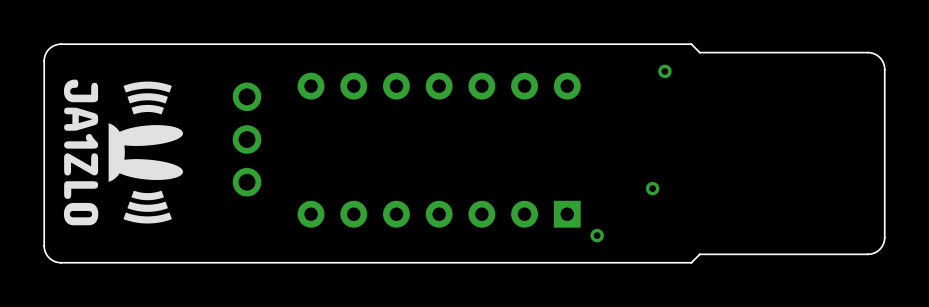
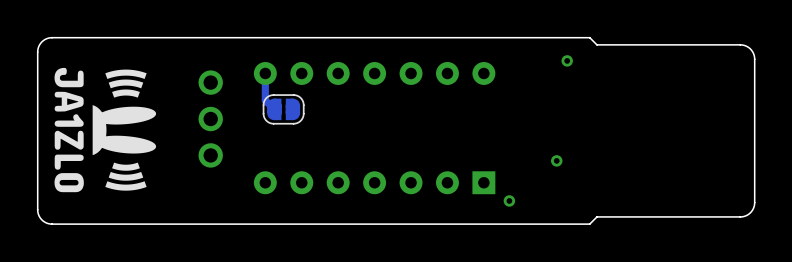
track: none -> (265, 73) (265, 100) (274, 109)
part: none -> (283, 109)

